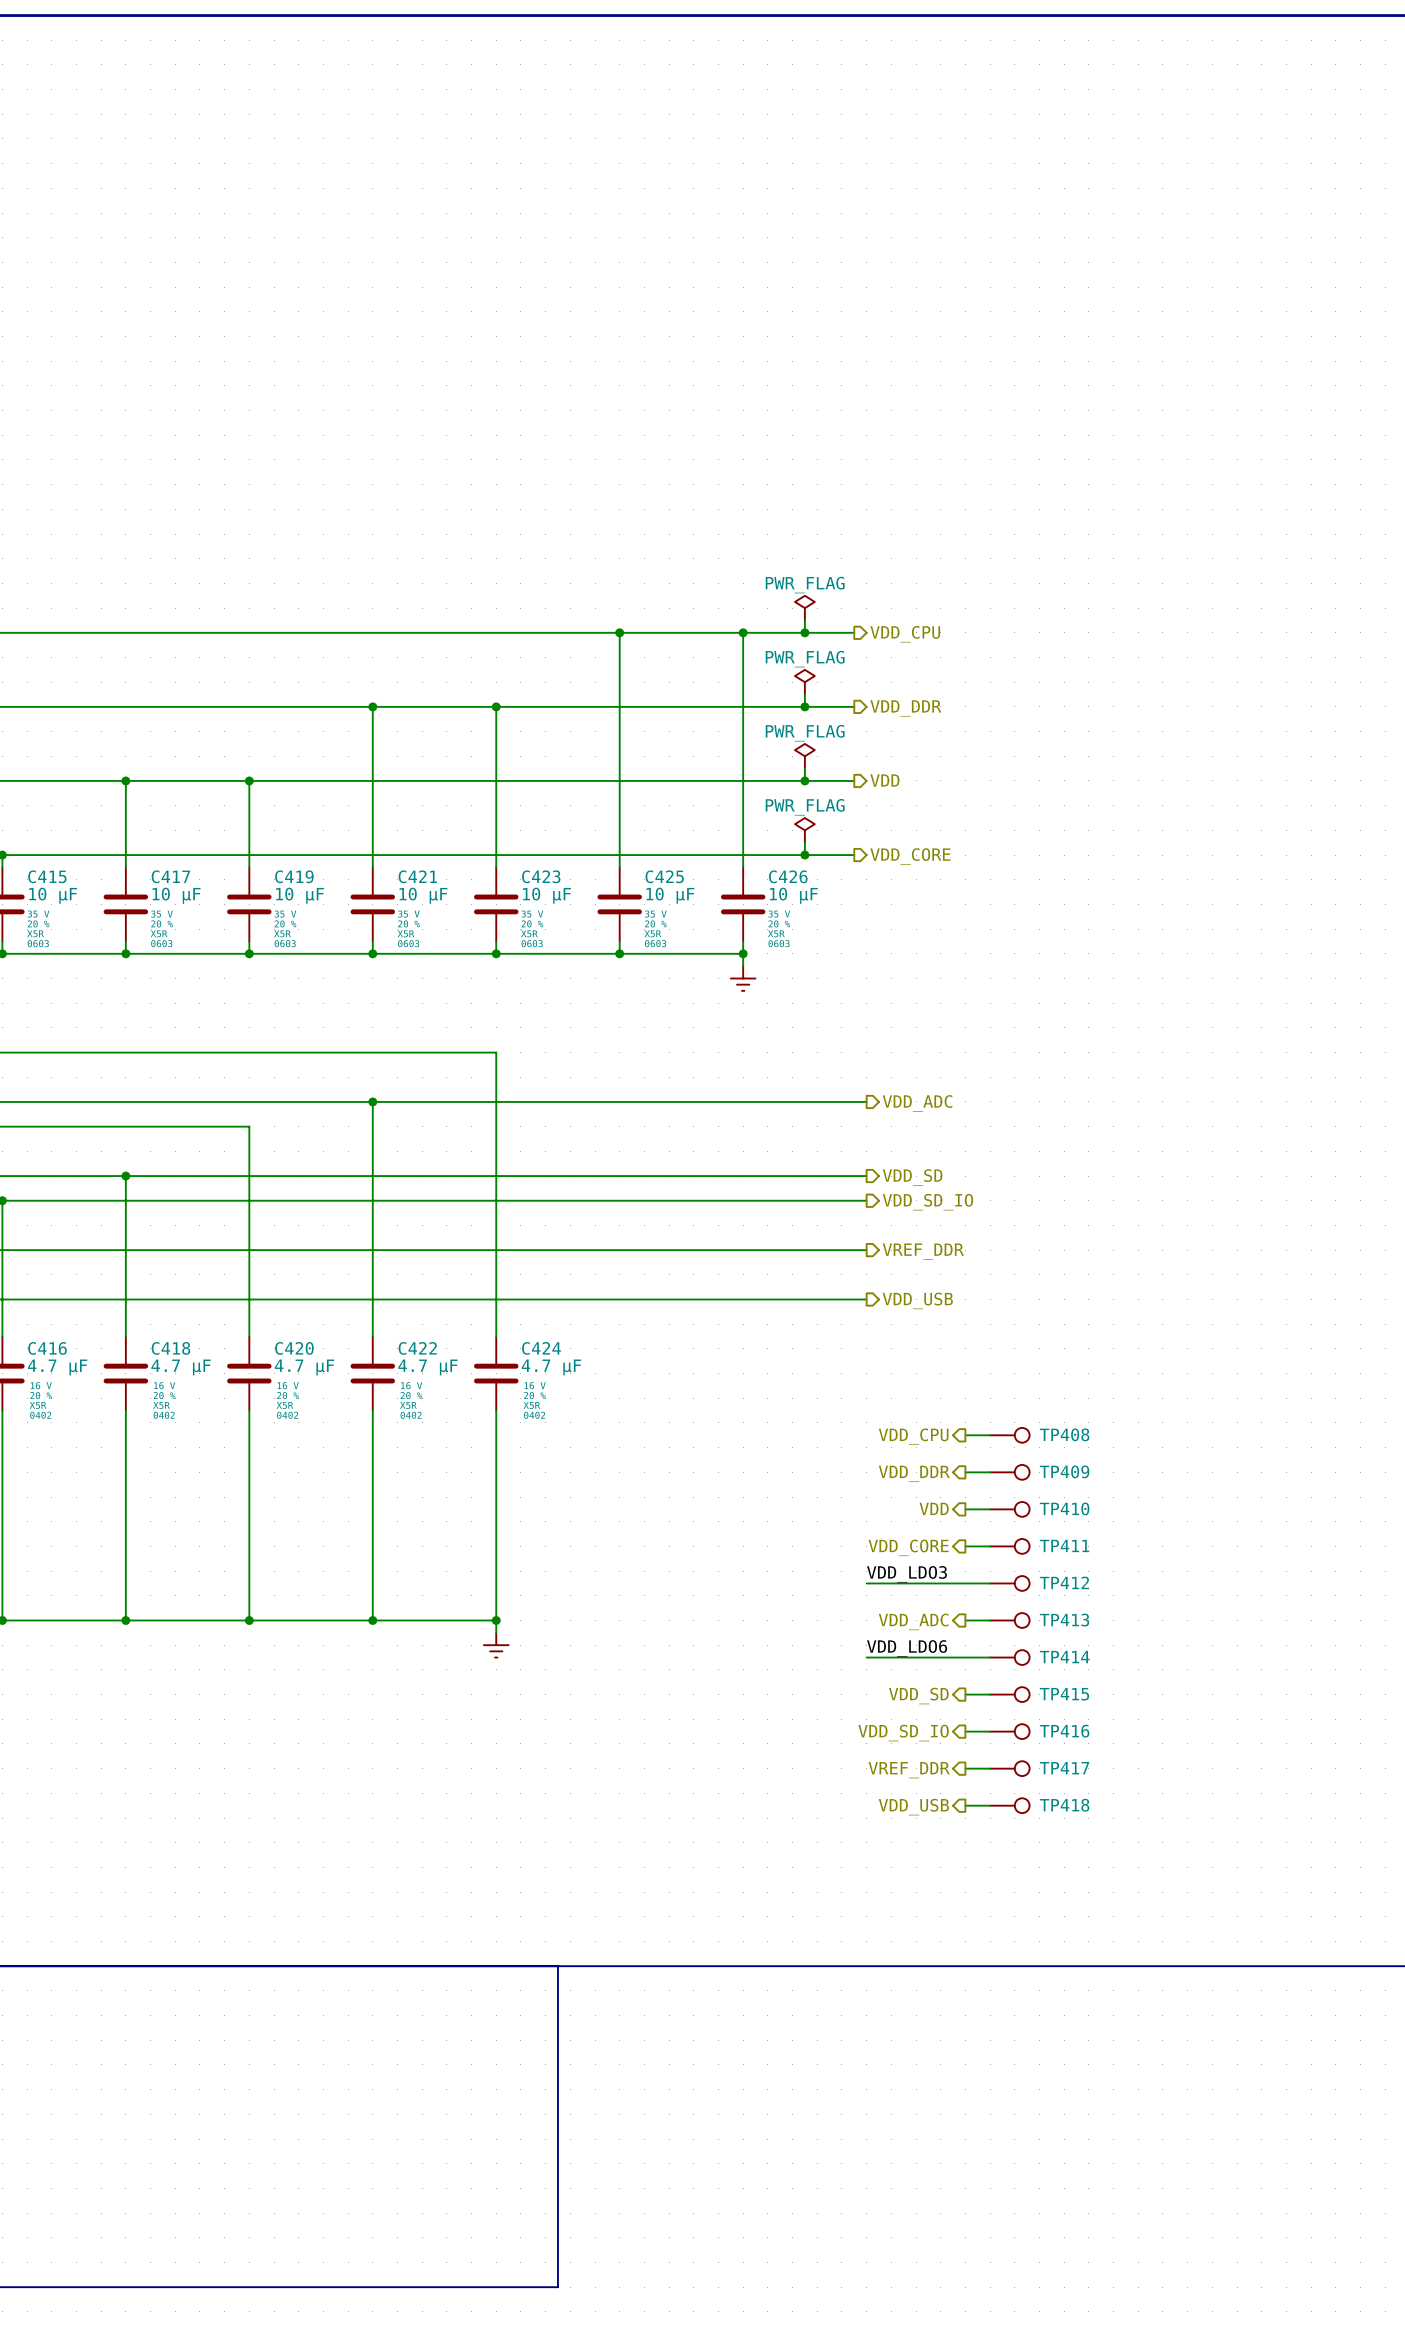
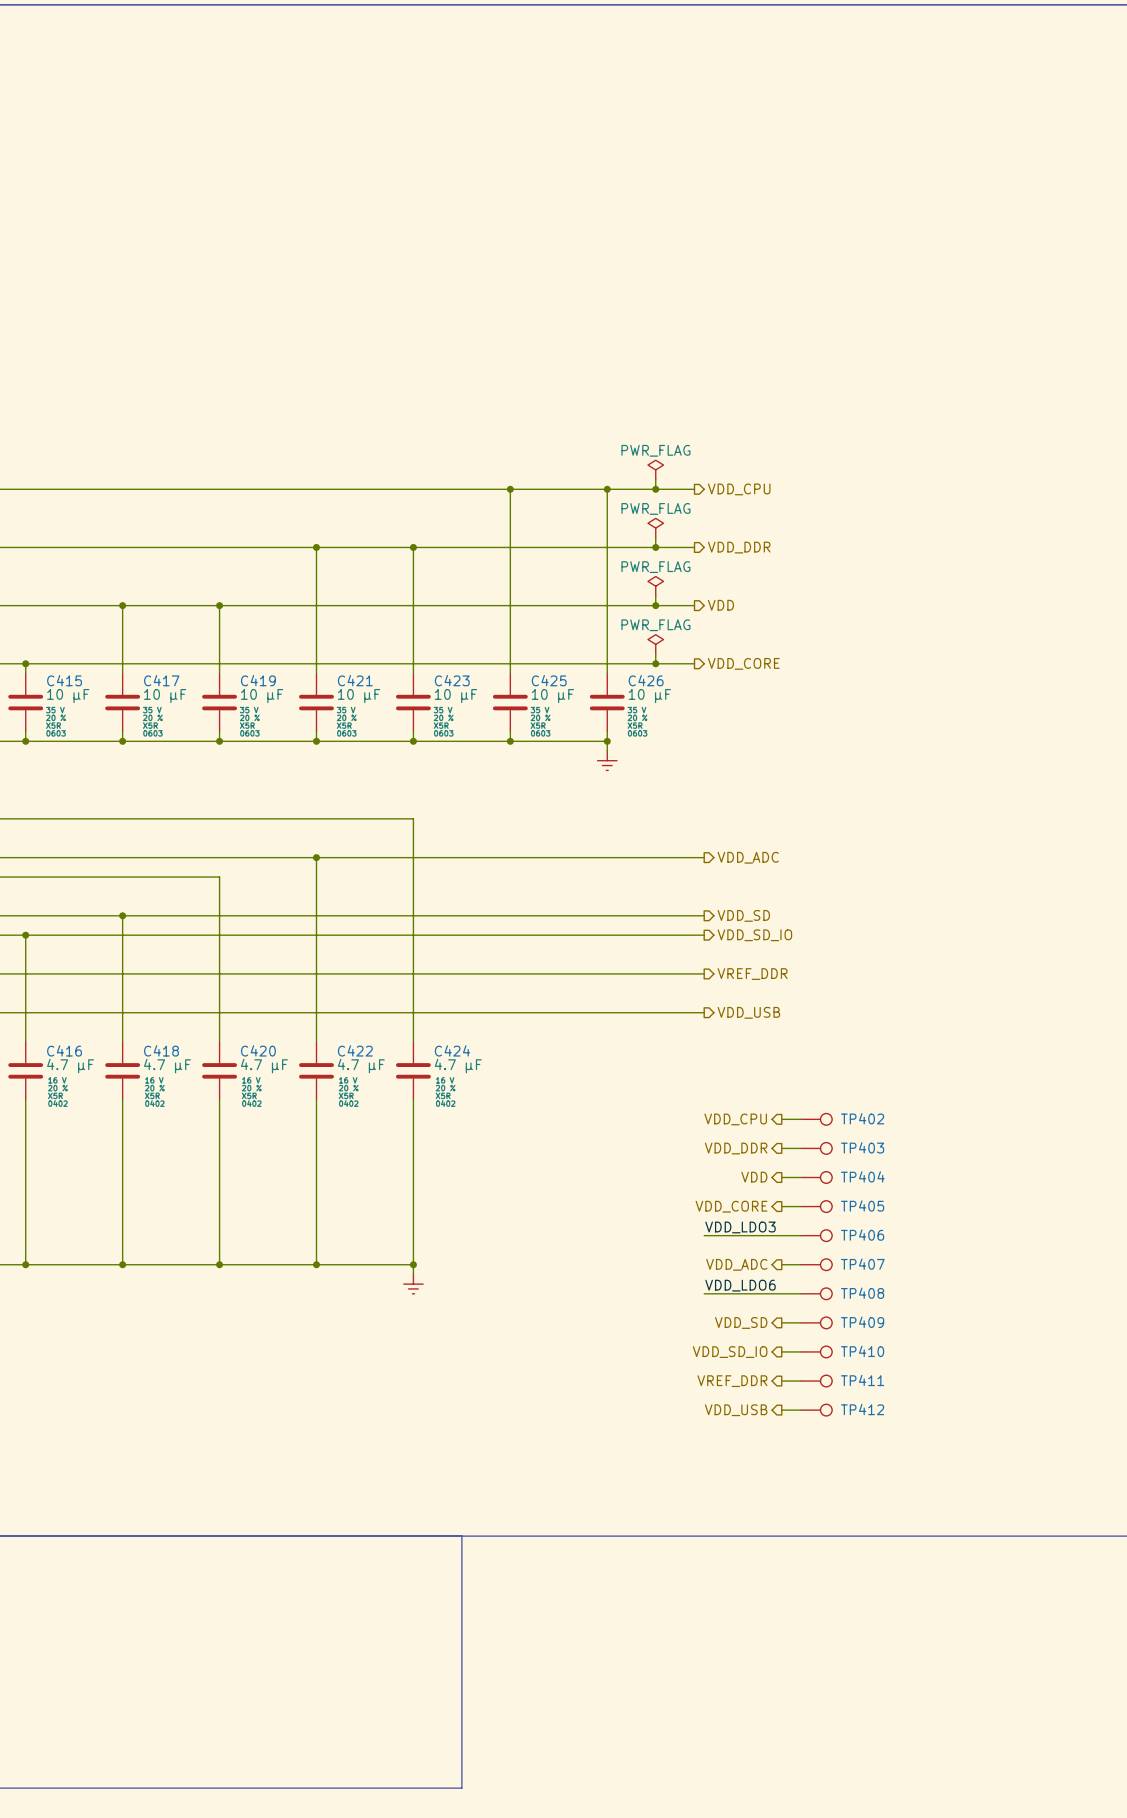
TP408 name: TP408 (1064, 1434) -> TP402 (862, 1118)
TP409 name: TP409 (1064, 1471) -> TP403 (862, 1147)
TP410 name: TP410 (1064, 1508) -> TP404 (862, 1176)
TP411 name: TP411 (1064, 1545) -> TP405 (862, 1205)
TP412 name: TP412 (1064, 1582) -> TP406 (862, 1235)
TP413 name: TP413 (1064, 1620) -> TP407 (862, 1264)
TP414 name: TP414 (1064, 1657) -> TP408 (862, 1293)
TP415 name: TP415 (1064, 1694) -> TP409 (862, 1322)
TP416 name: TP416 (1064, 1731) -> TP410 (862, 1351)
TP417 name: TP417 (1064, 1768) -> TP411 (862, 1380)
TP418 name: TP418 (1064, 1805) -> TP412 (862, 1409)

